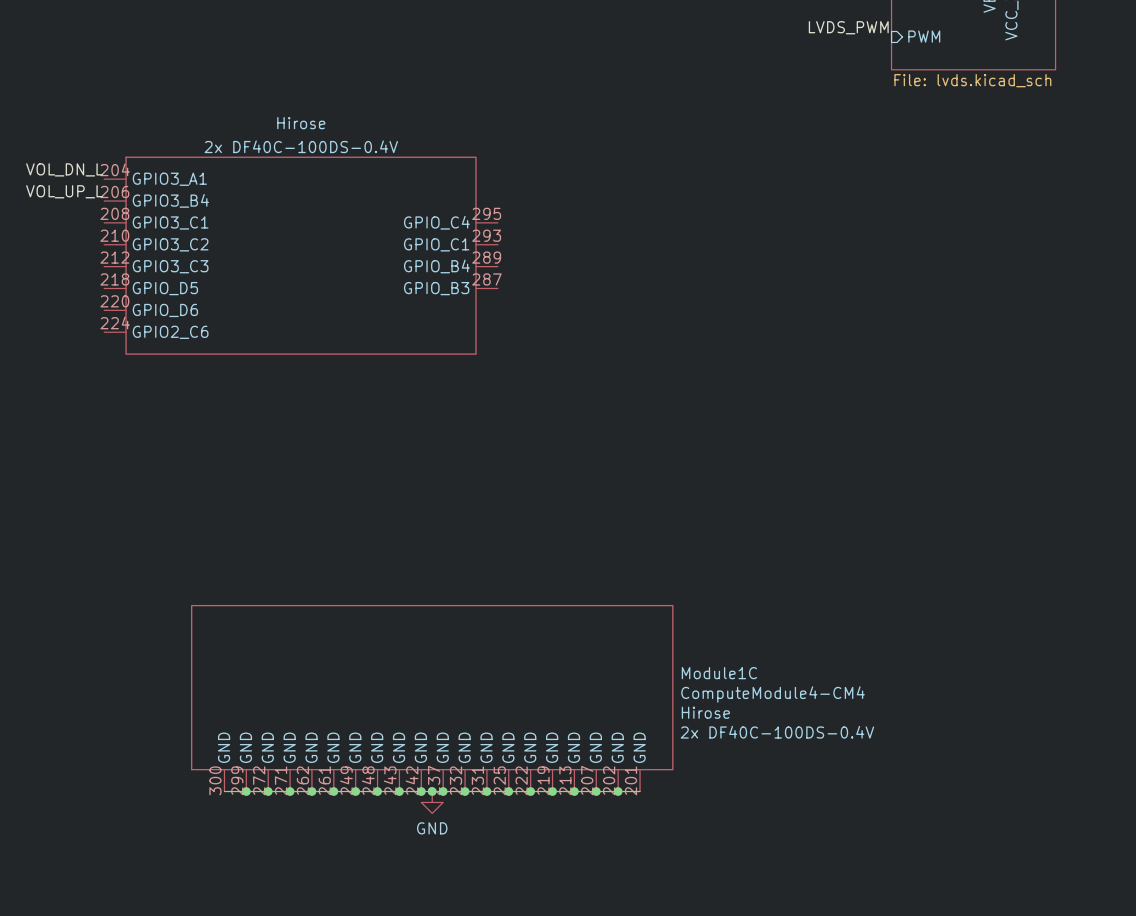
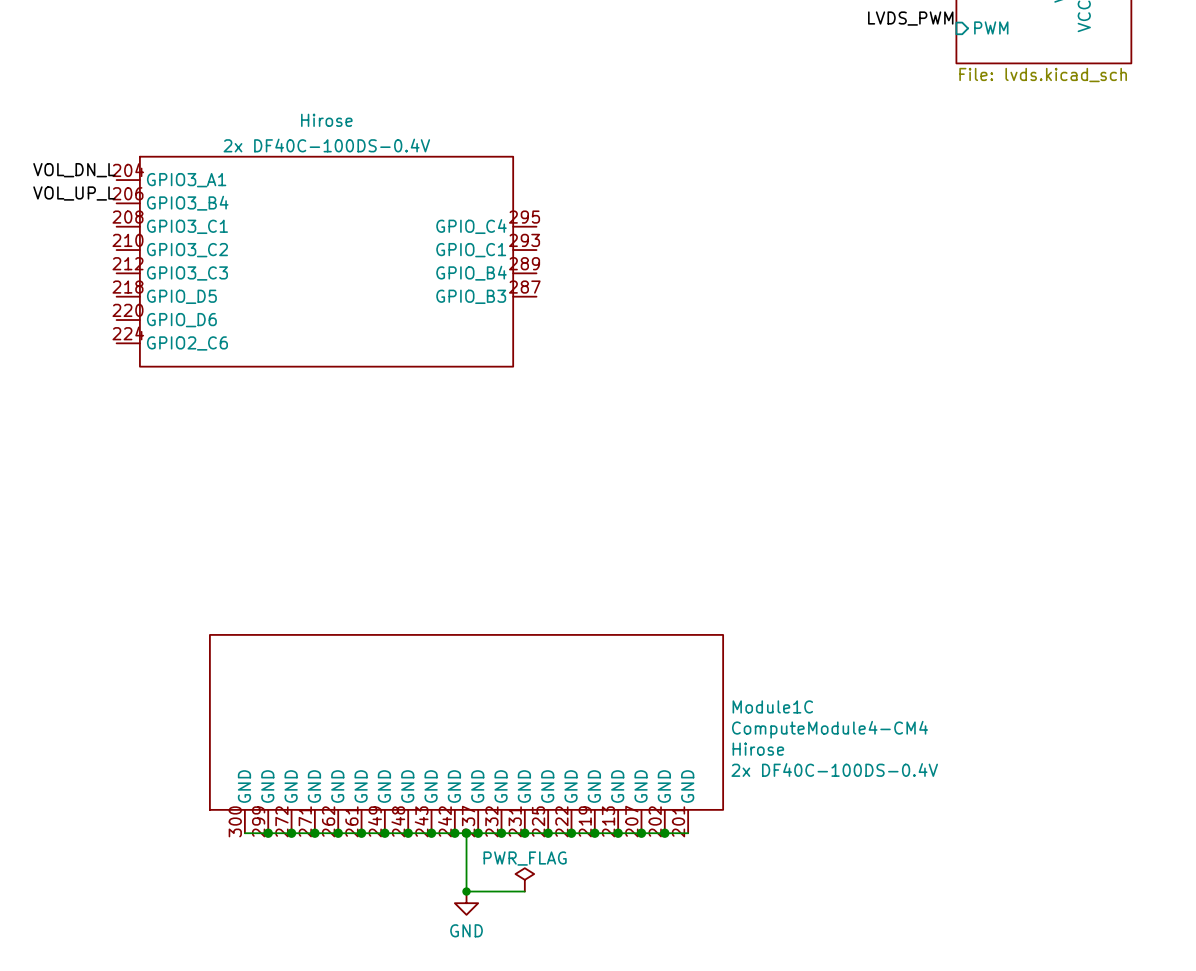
wire: none -> (466, 833) (466, 891) (524, 891)
power symbol position: GND (432, 802) -> GND (466, 903)
power symbol: none -> PWR_FLAG (524, 879)
junction: none -> (466, 891)

